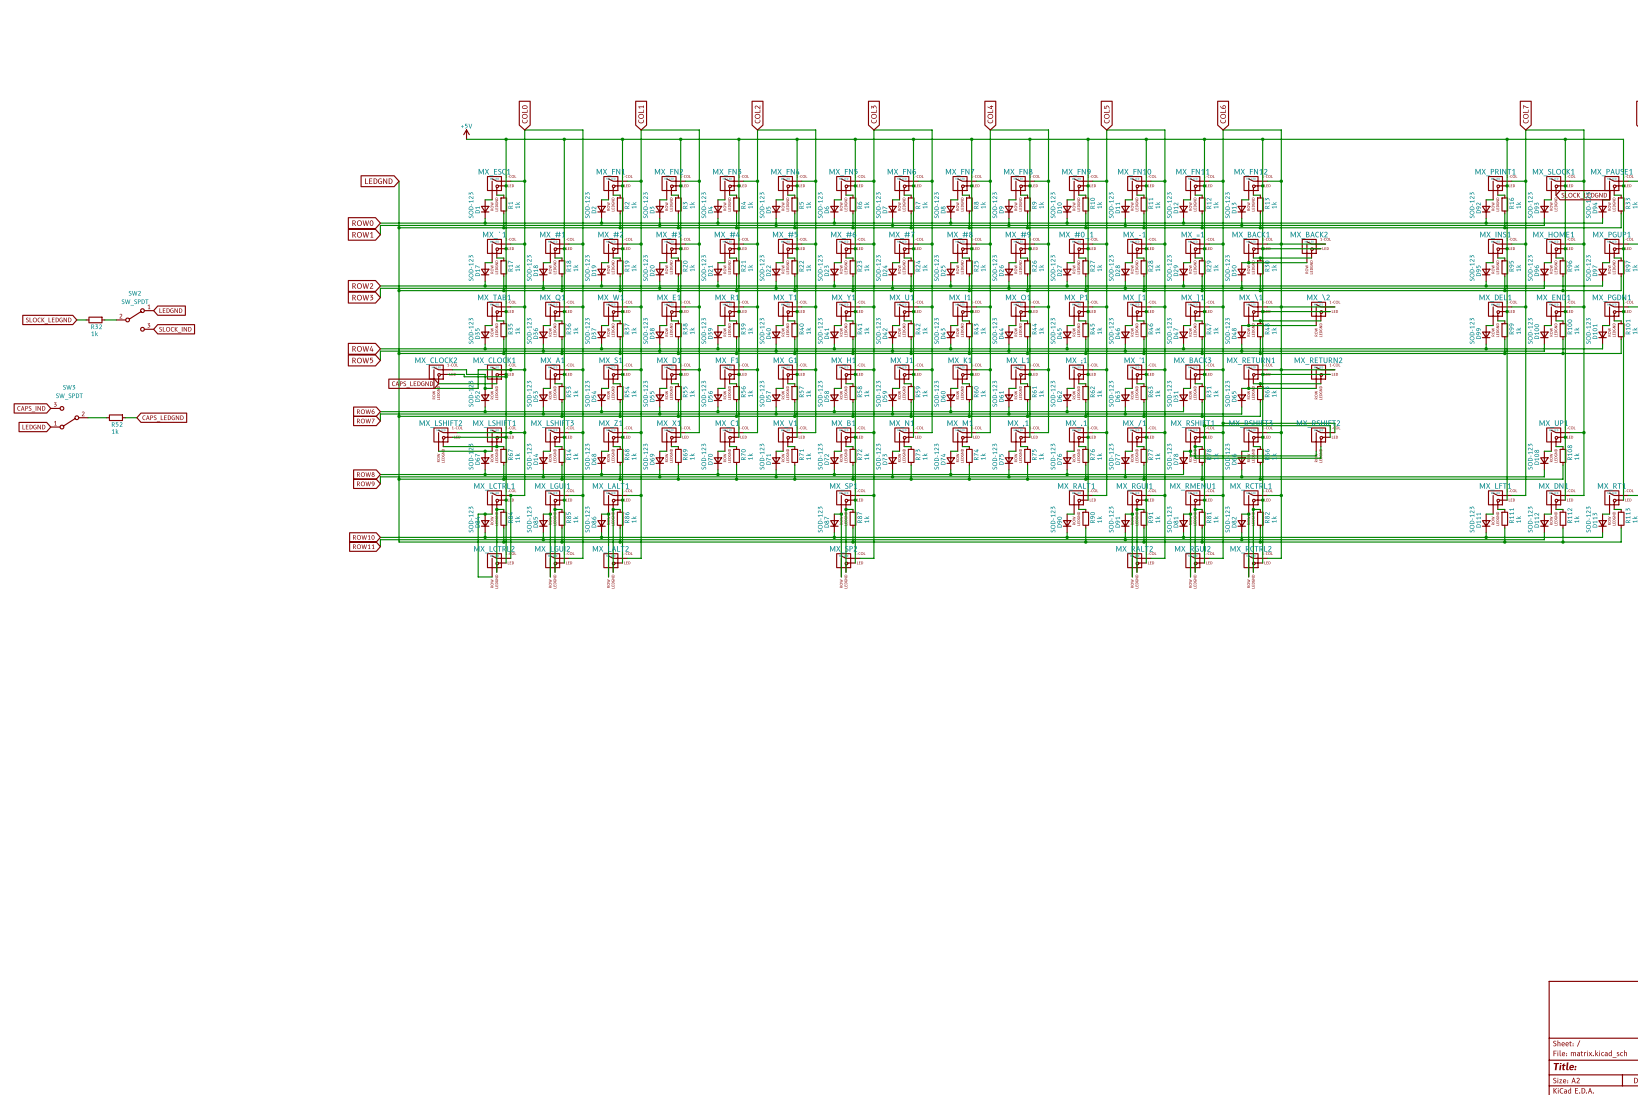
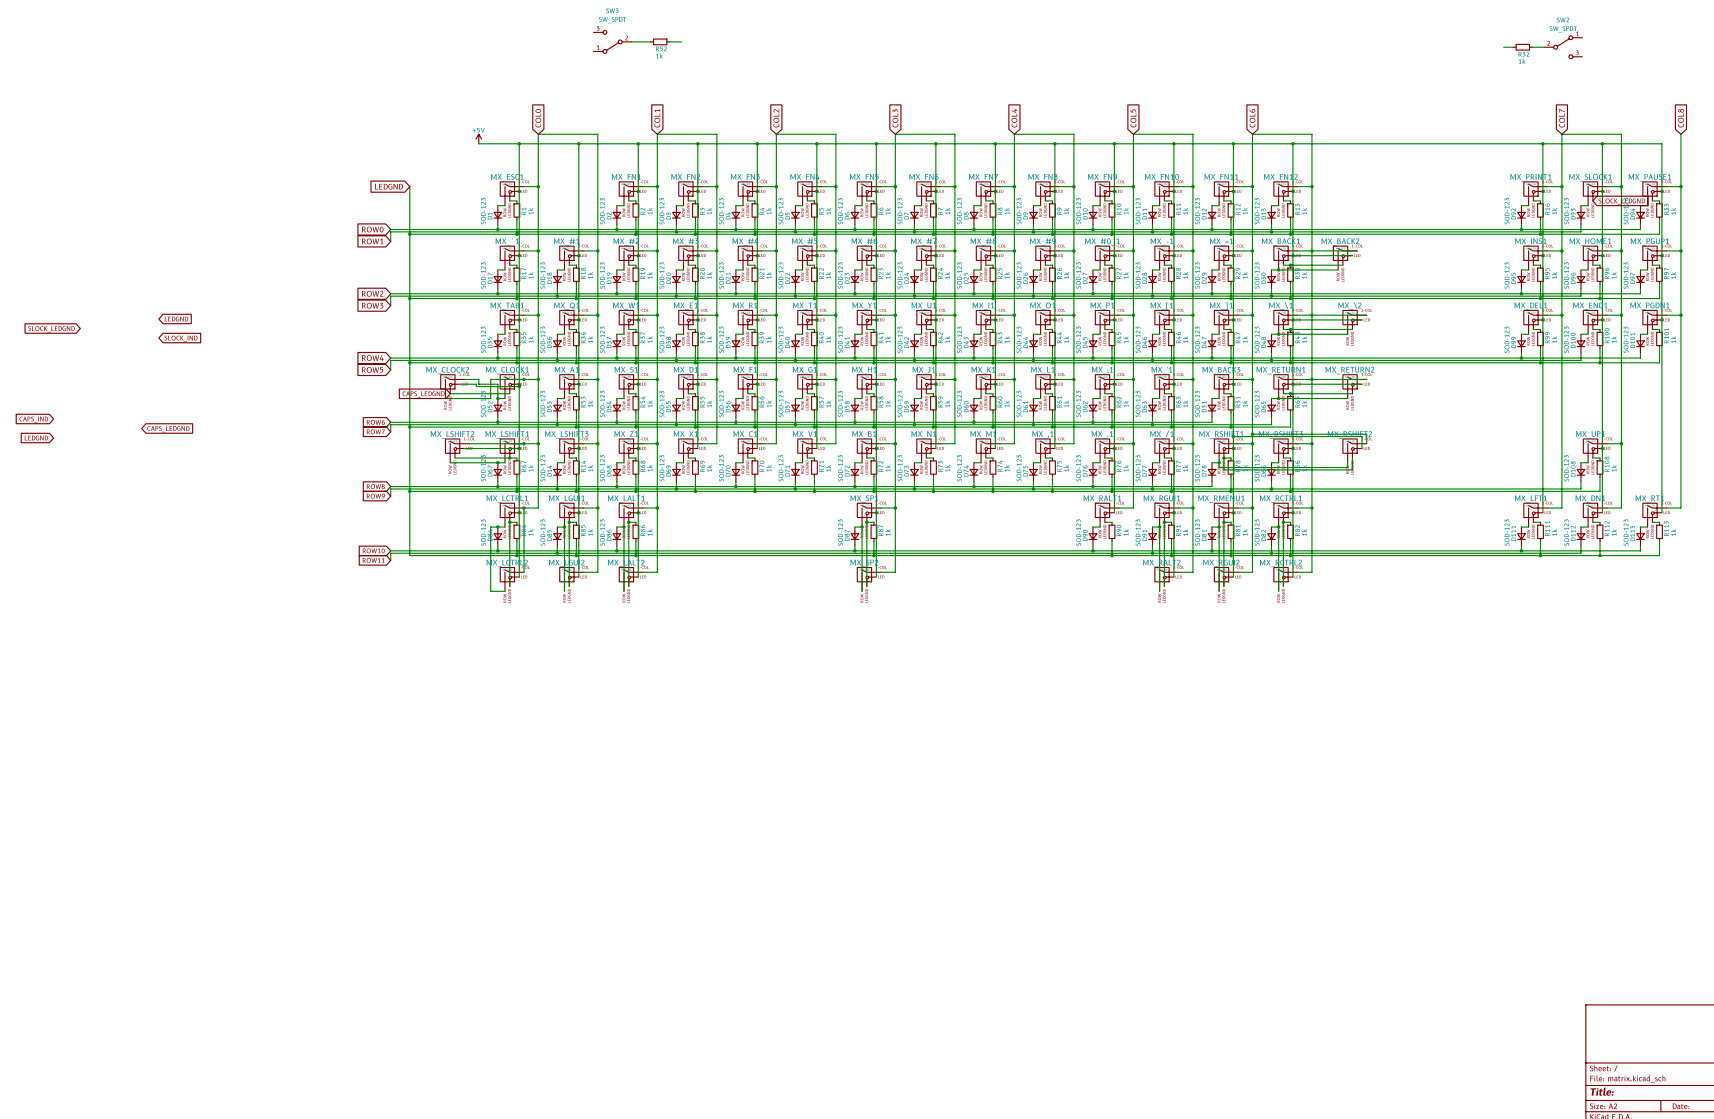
wire: none -> (631, 41) (650, 41)
wire: none -> (669, 41) (681, 41)
wire: none -> (1503, 47) (1513, 47)
wire: none -> (1532, 47) (1544, 47)
wire: (76, 319) (86, 319) -> none
part position: (95, 319) -> (1522, 47)
wire: (104, 319) (116, 319) -> none
part position: (135, 319) -> (1563, 47)
part position: (69, 417) -> (612, 41)
wire: (88, 417) (106, 417) -> none
part position: (115, 417) -> (660, 41)
wire: (125, 417) (136, 417) -> none

